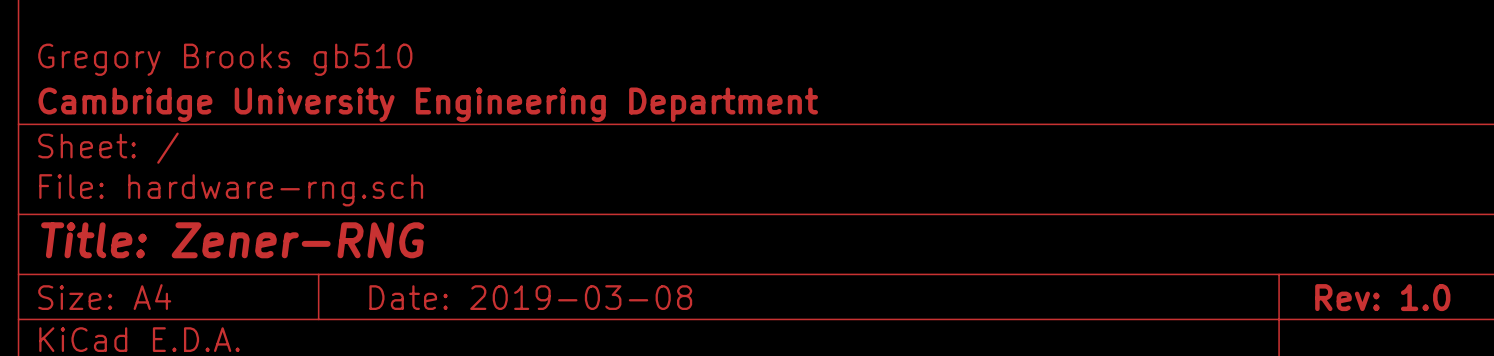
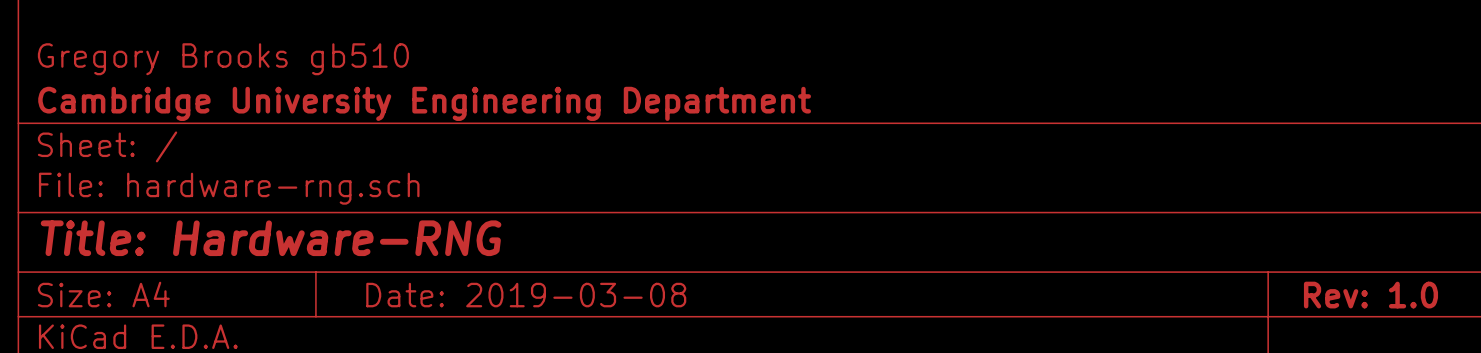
title block: Title: Zener-RNG (232, 240) -> Title: Hardware-RNG (271, 238)

